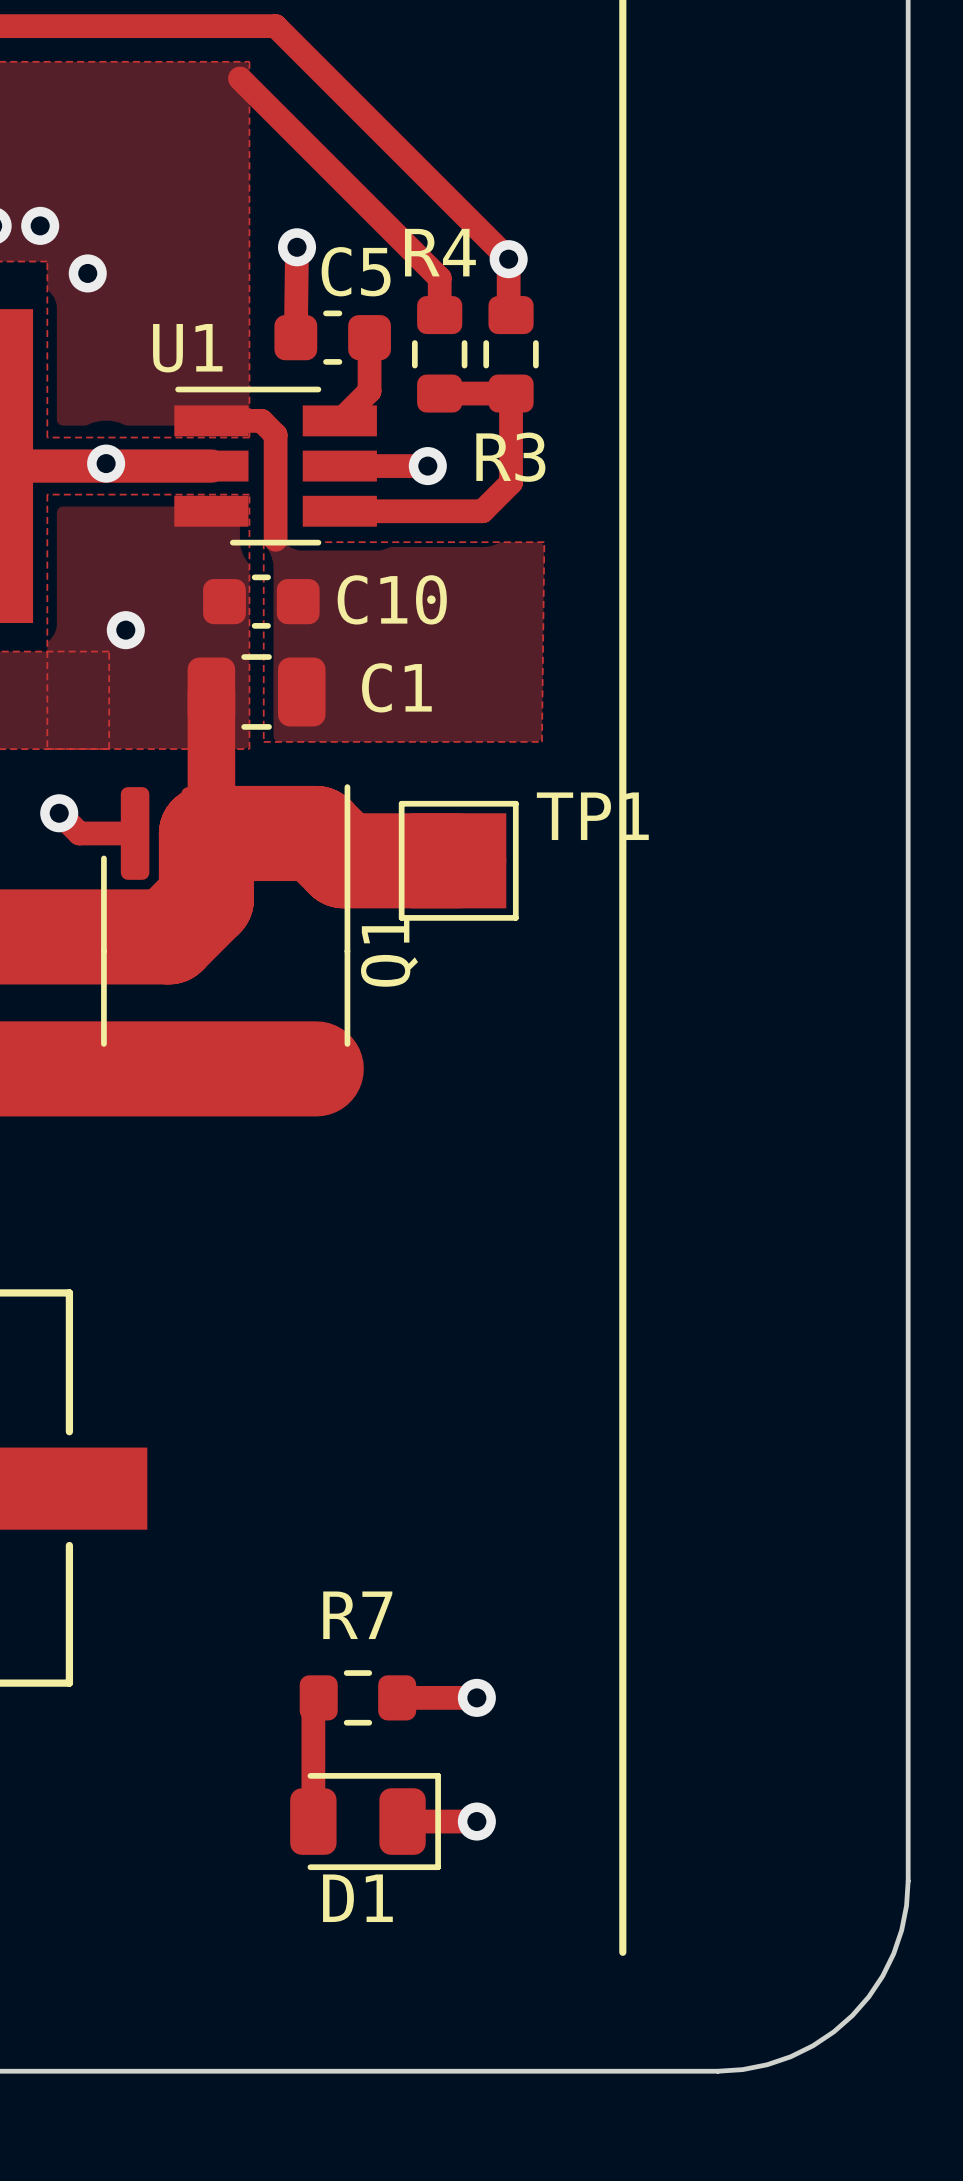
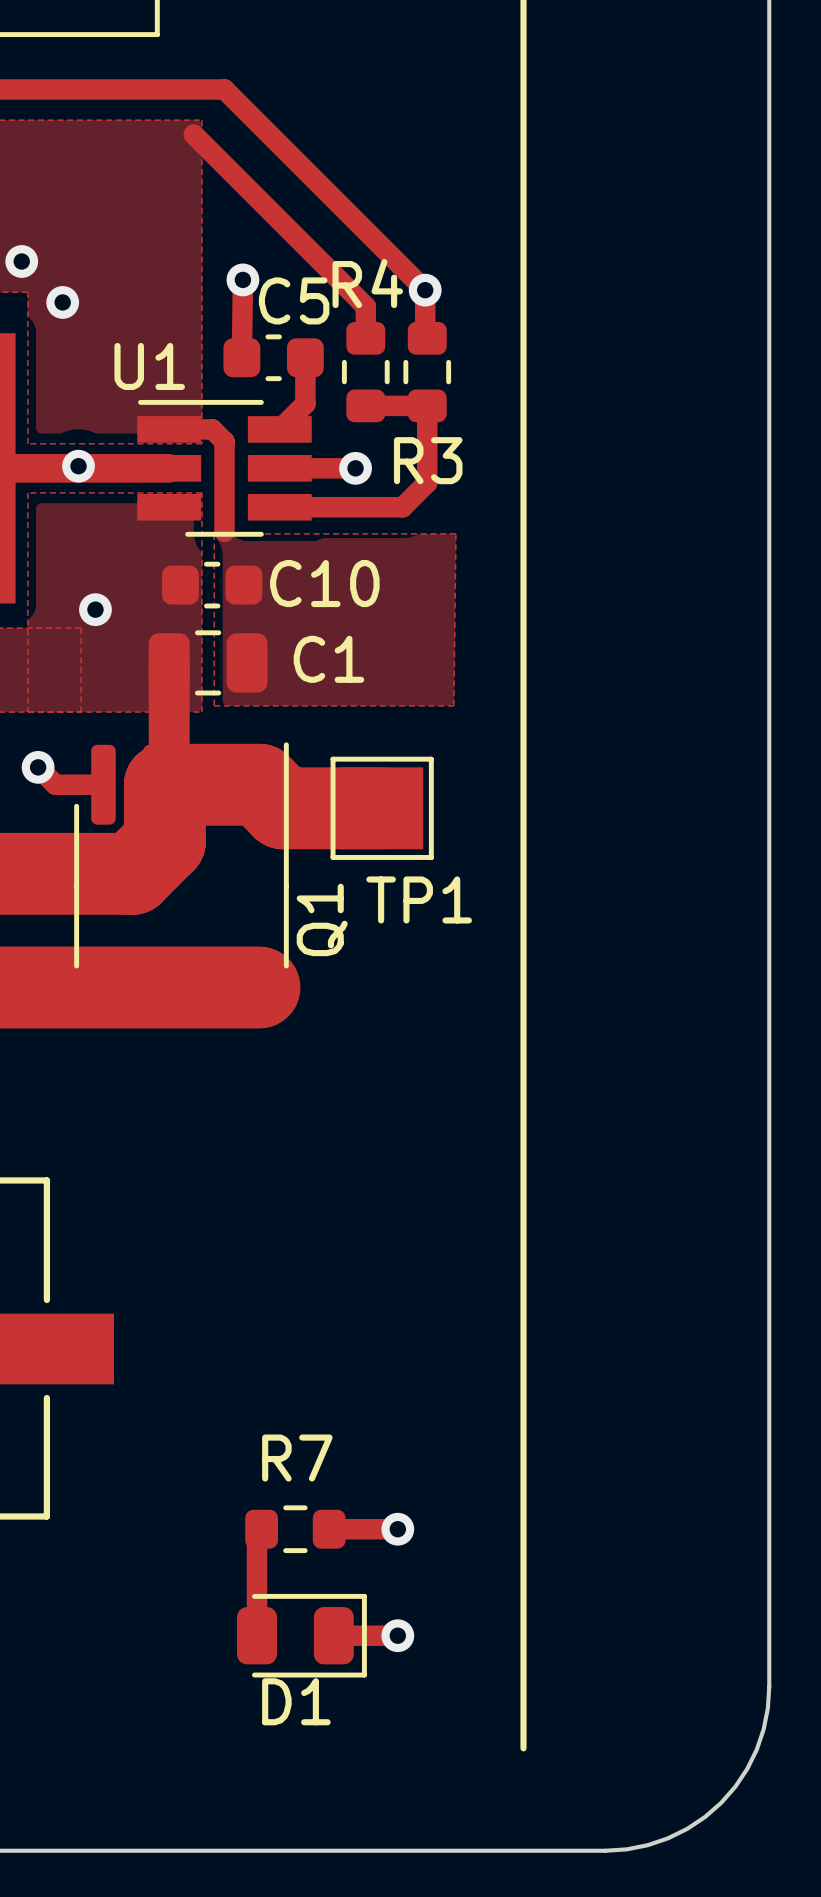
TP1 name position: TP1 (592, 816) -> TP1 (419, 899)
Q1 name position: Q1 (389, 951) -> Q1 (322, 919)

